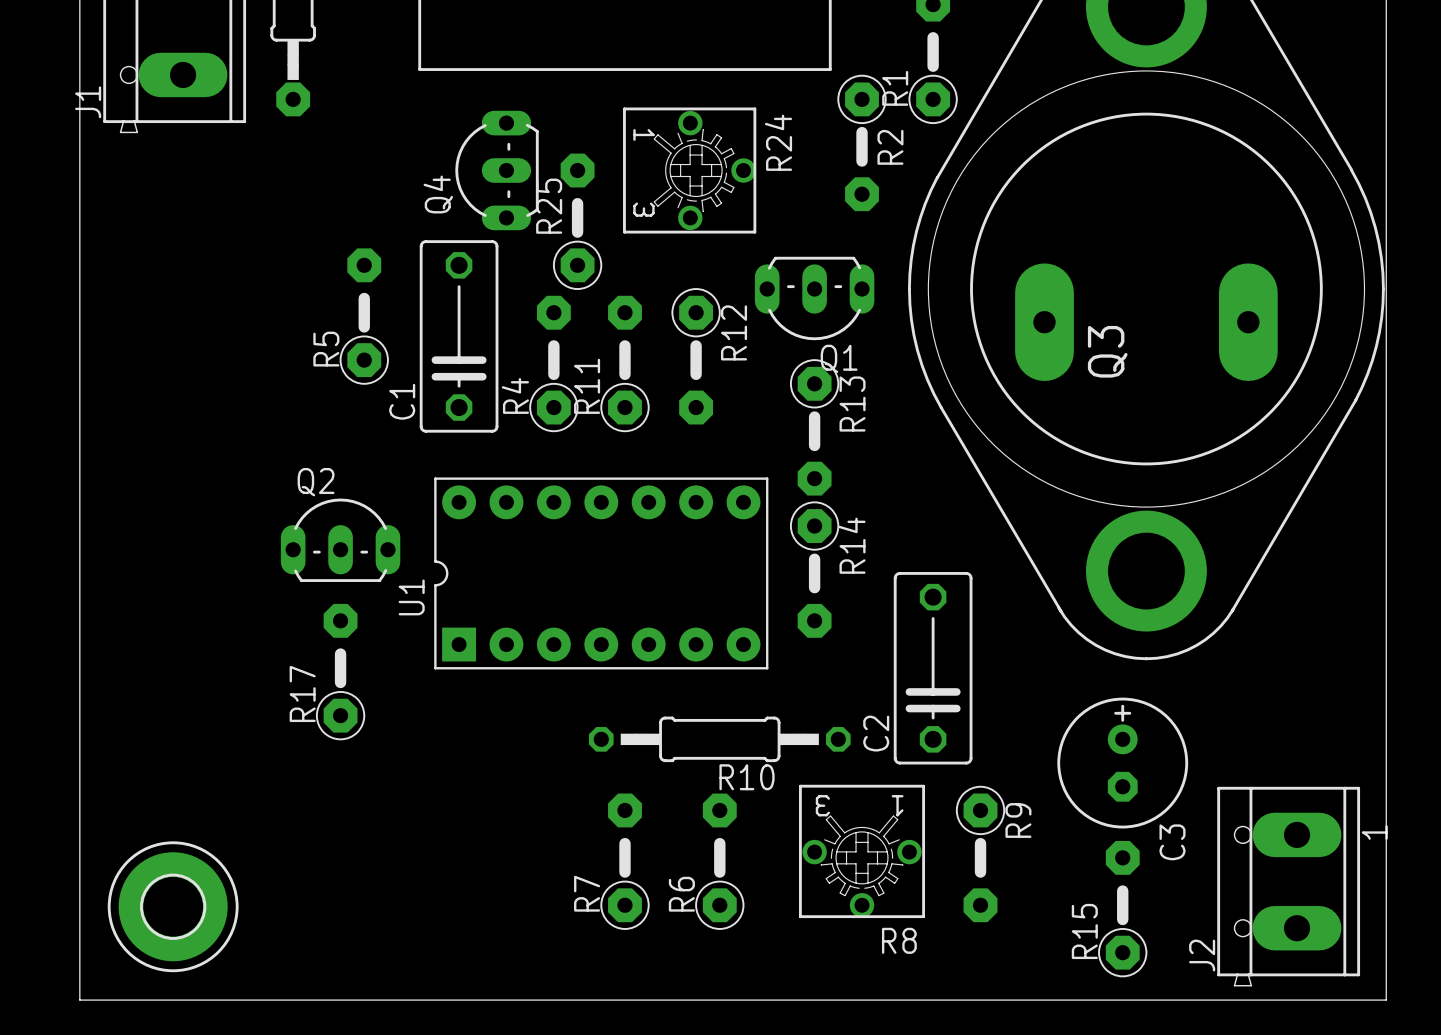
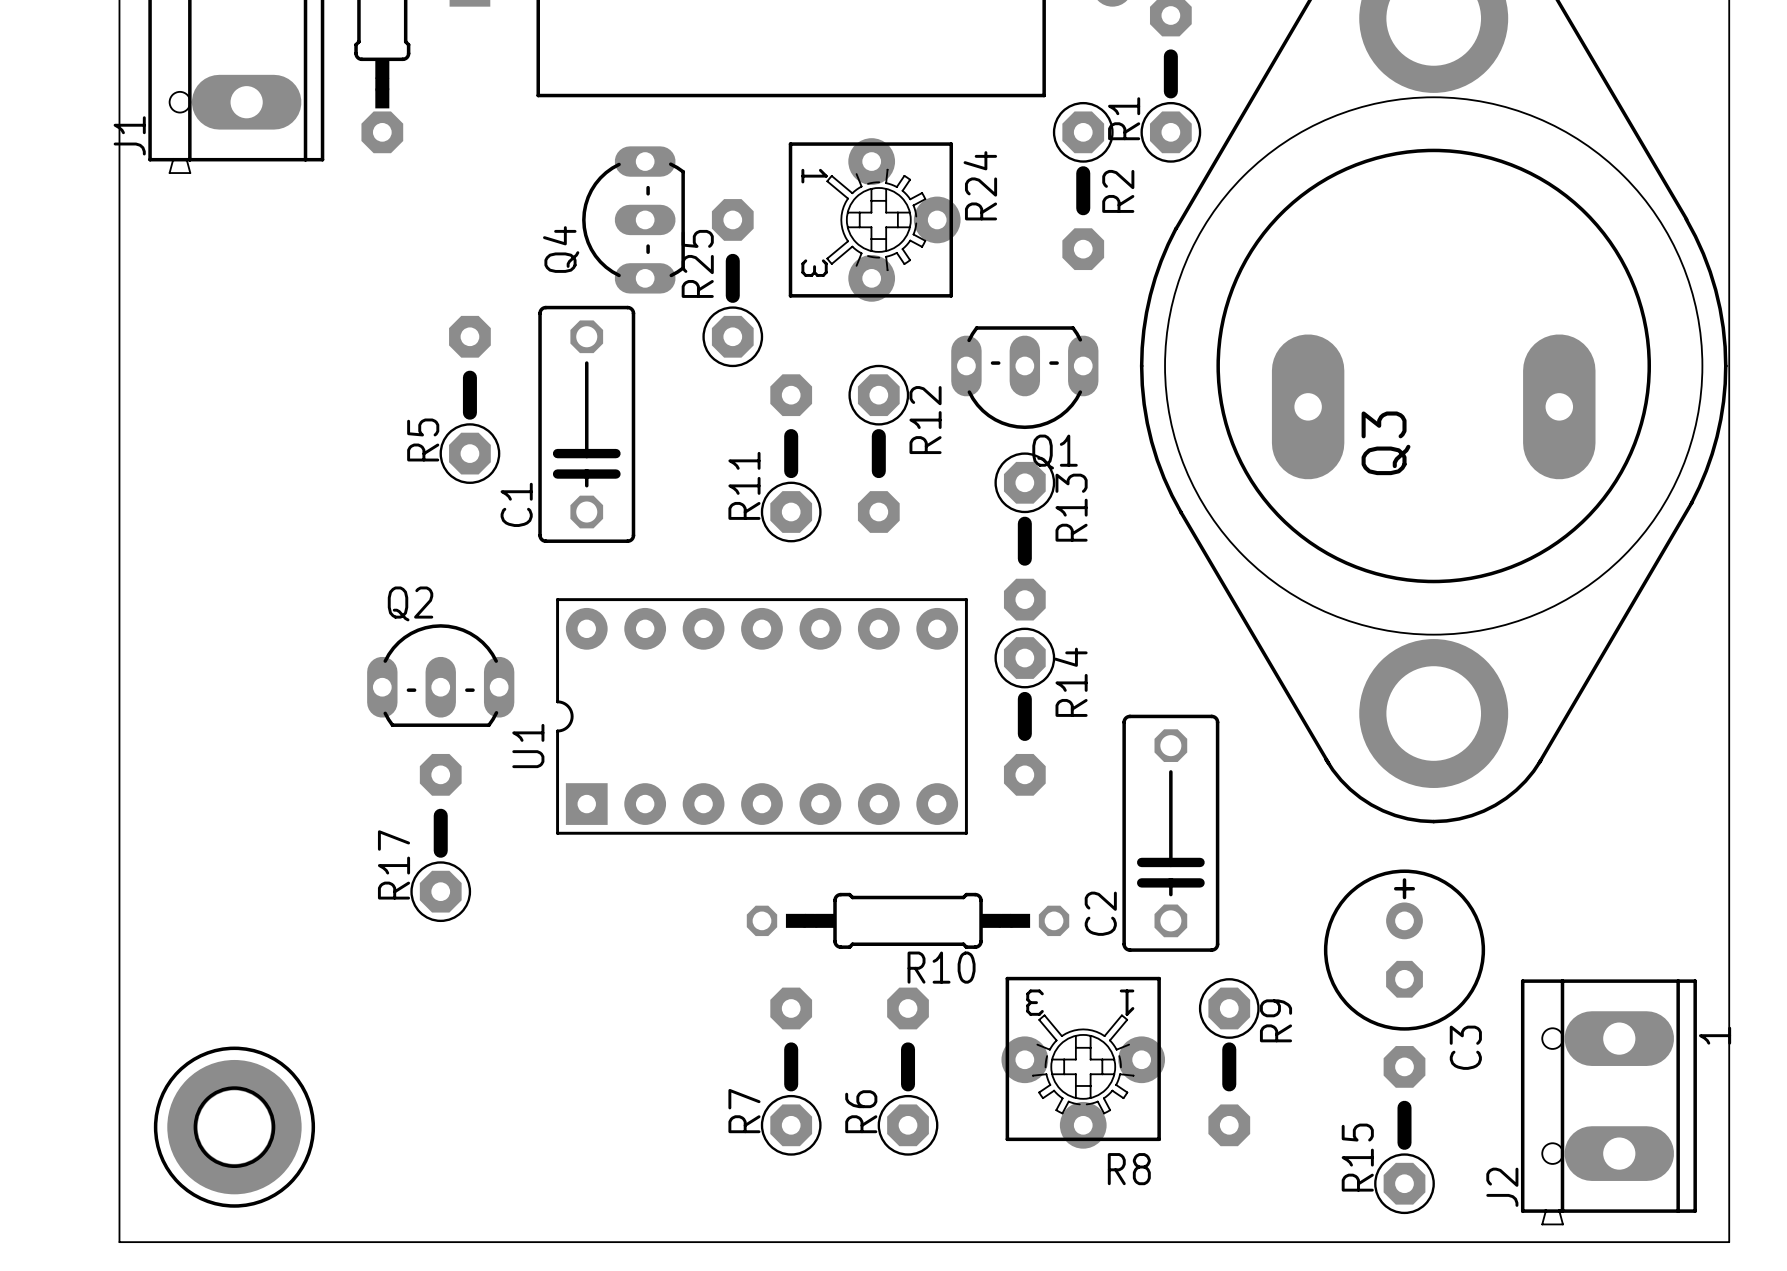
R24 footprint: [623, 107, 757, 234] -> [788, 138, 961, 302]
R4: (553, 363) -> none
R8 footprint: [799, 784, 926, 919] -> [1001, 976, 1166, 1149]

